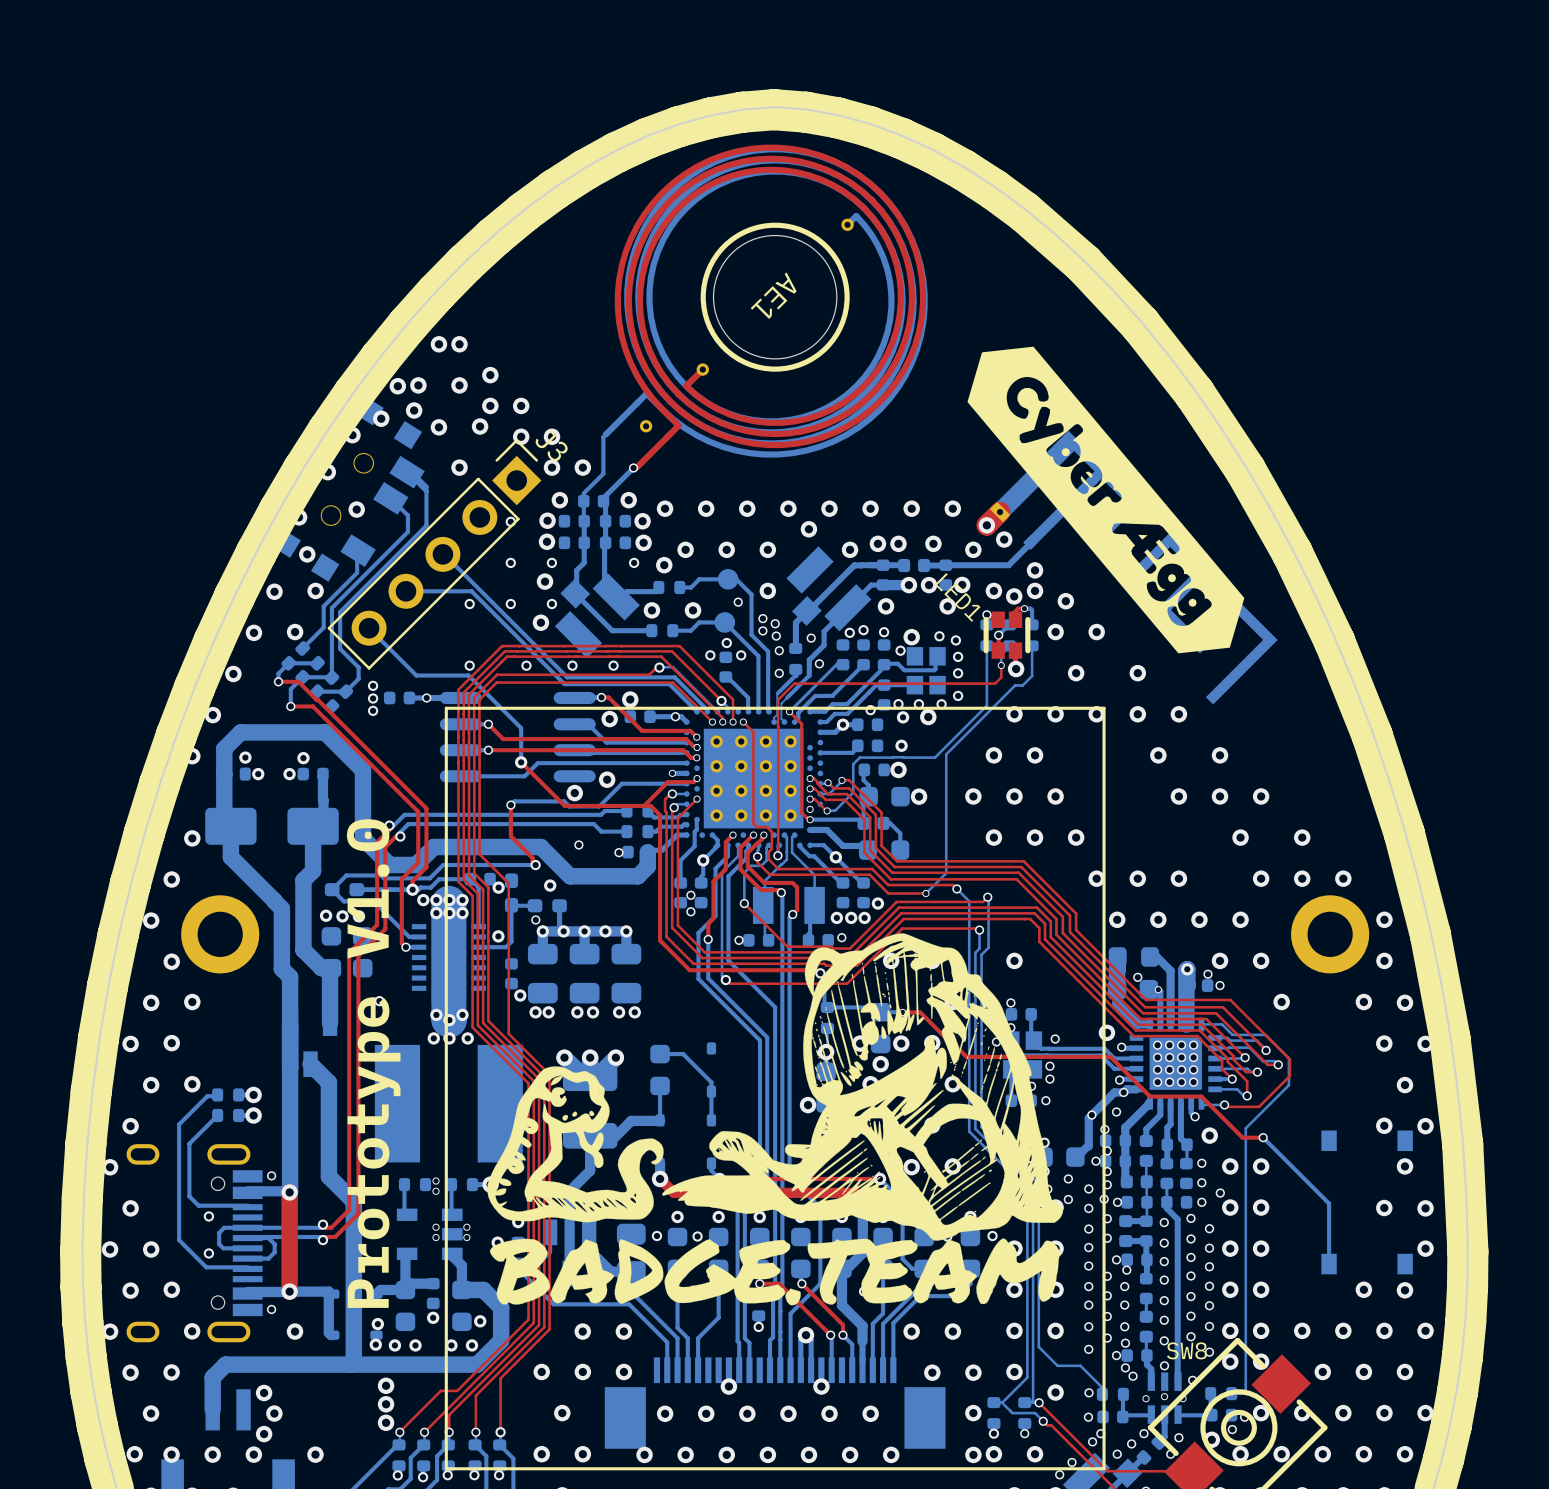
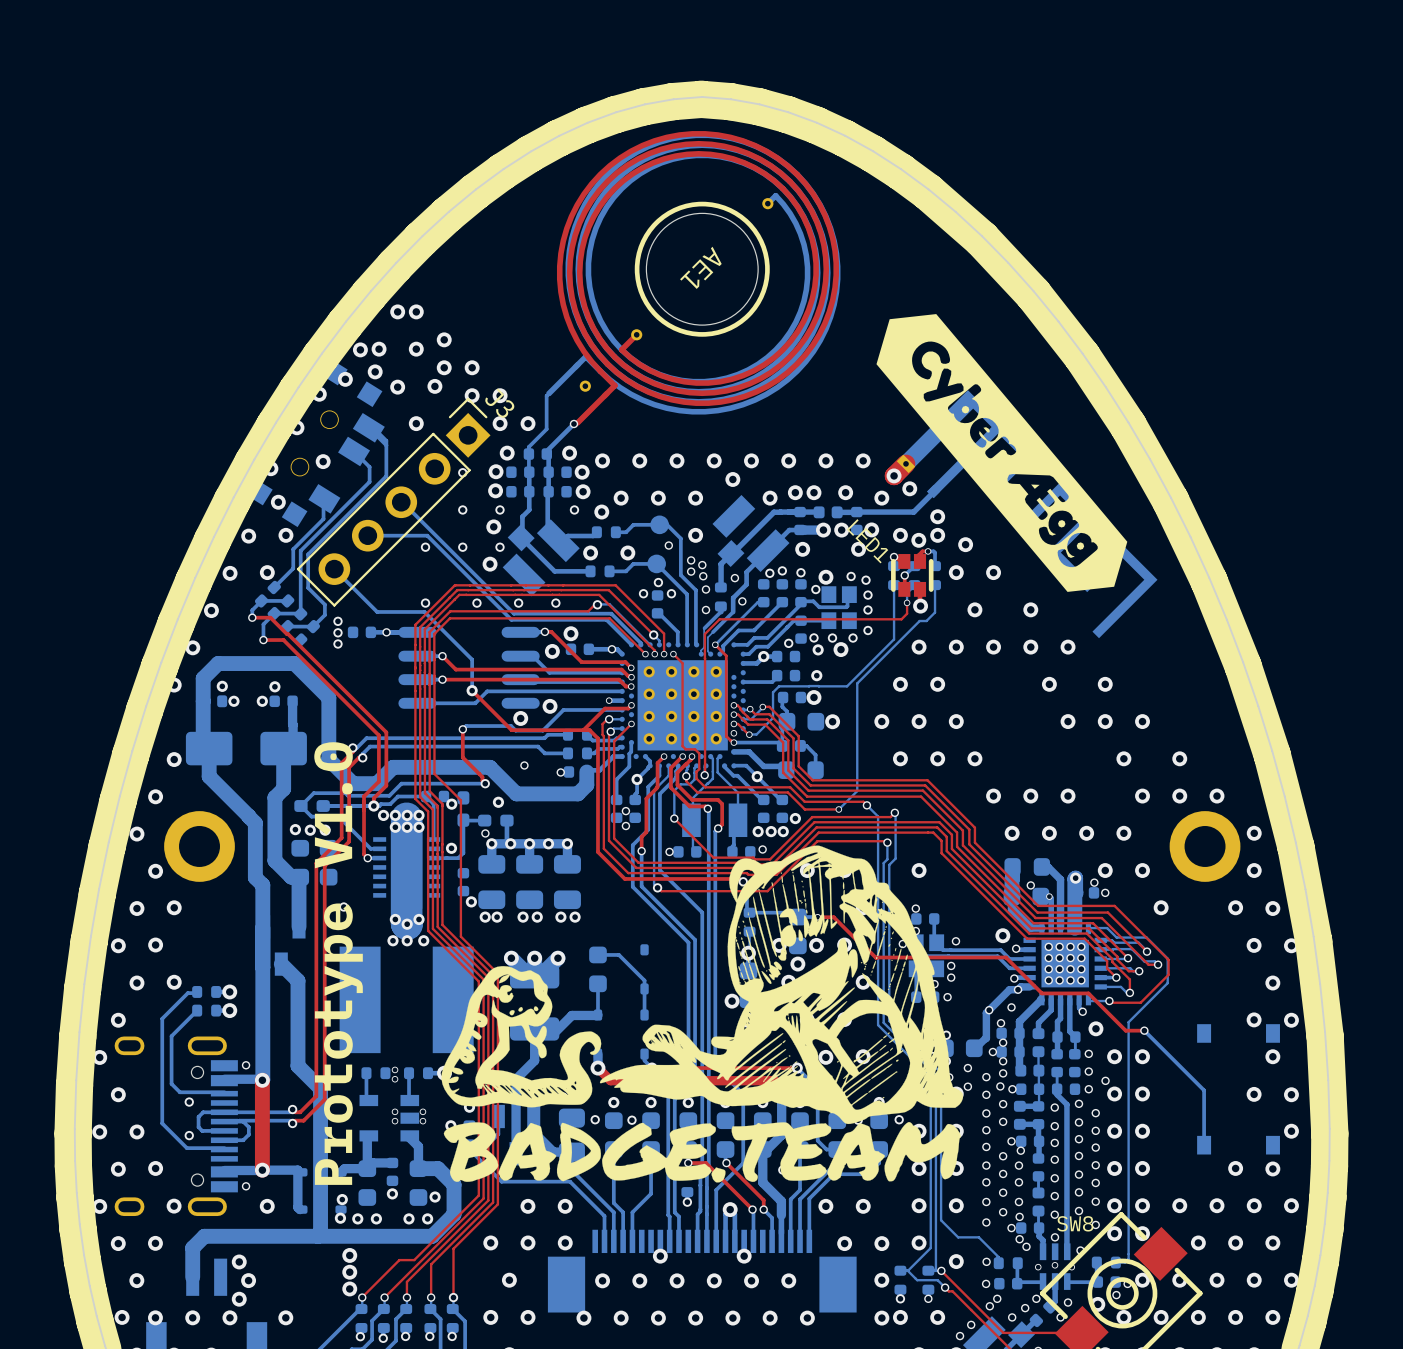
line: (446, 708) (1104, 708) (1104, 1468) (446, 1468) (446, 708) -> none

